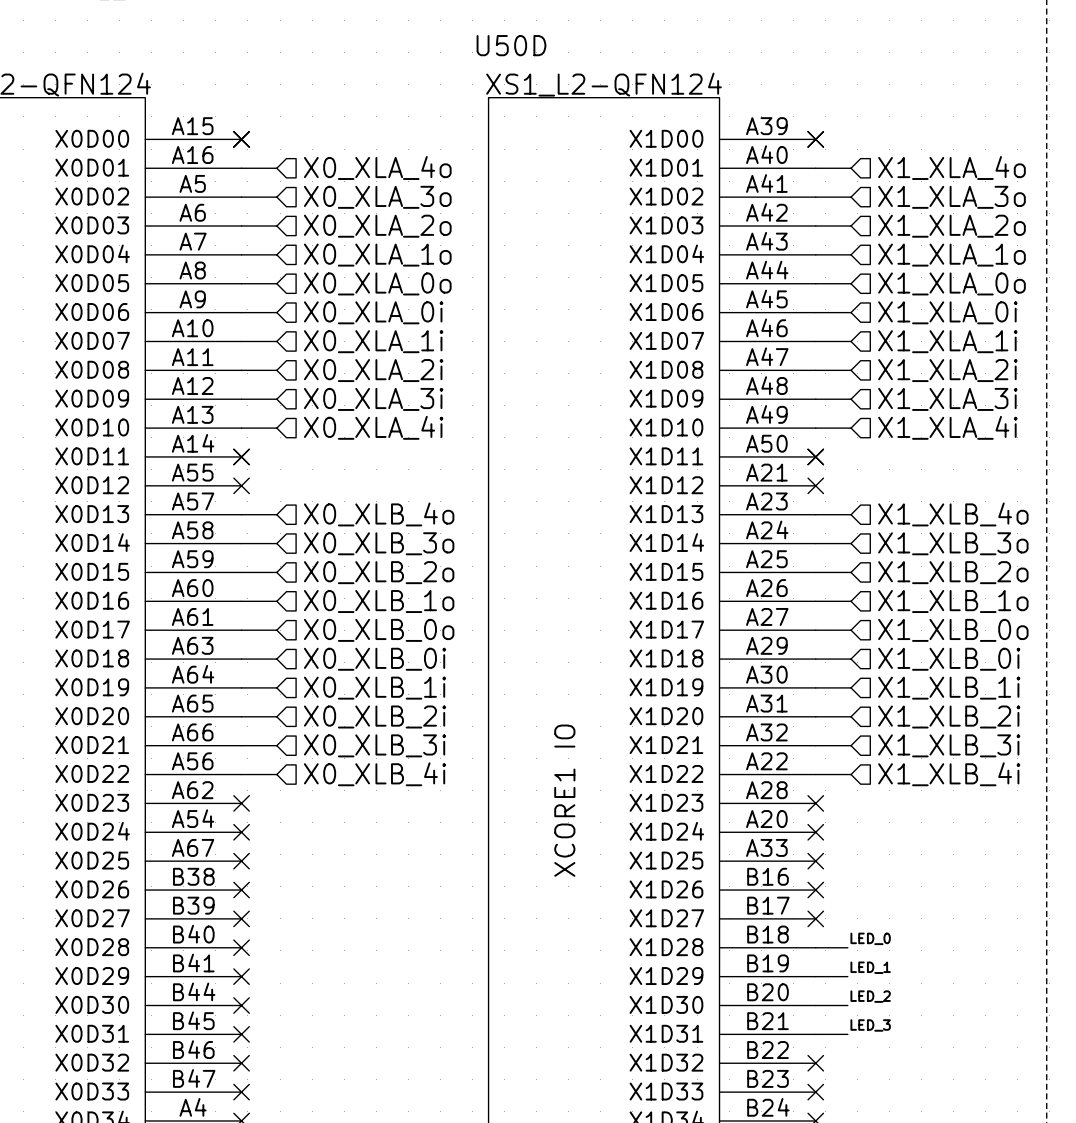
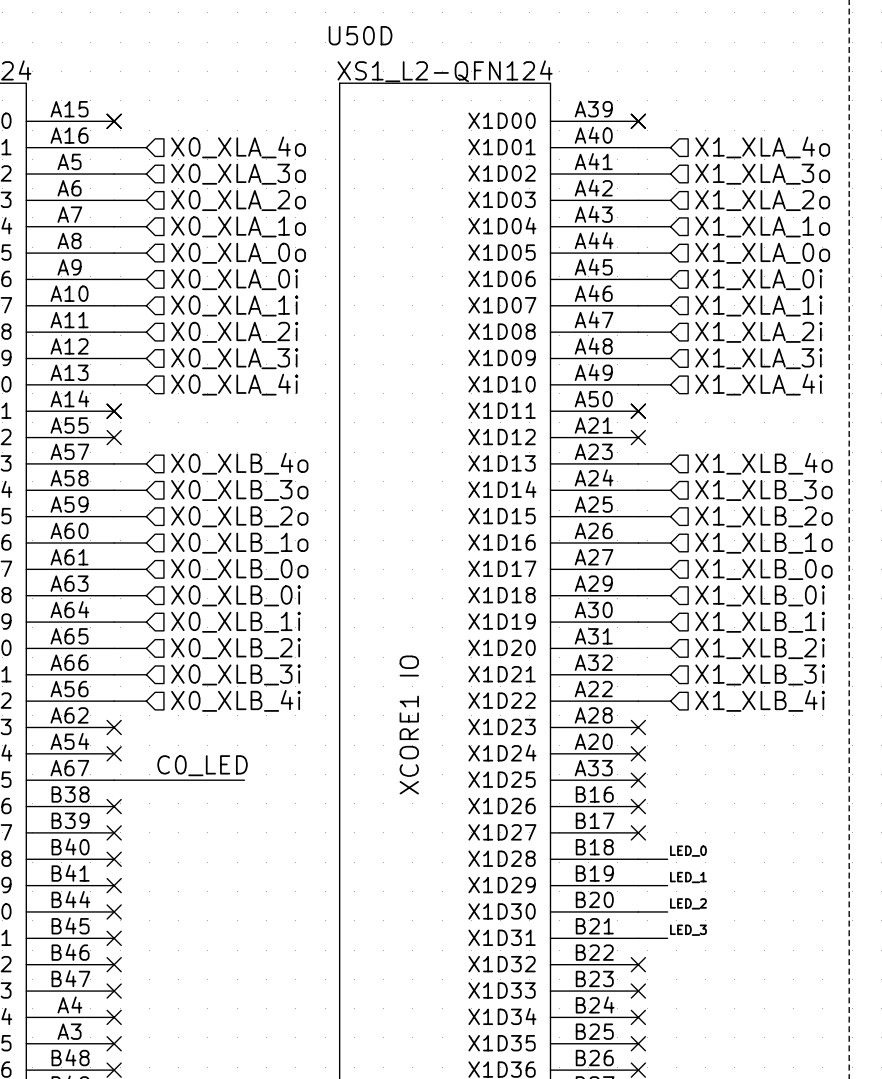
label: none -> C0_LED (202, 765)
wire: none -> (114, 780) (244, 780)
no-connect mark: (241, 861) -> none

